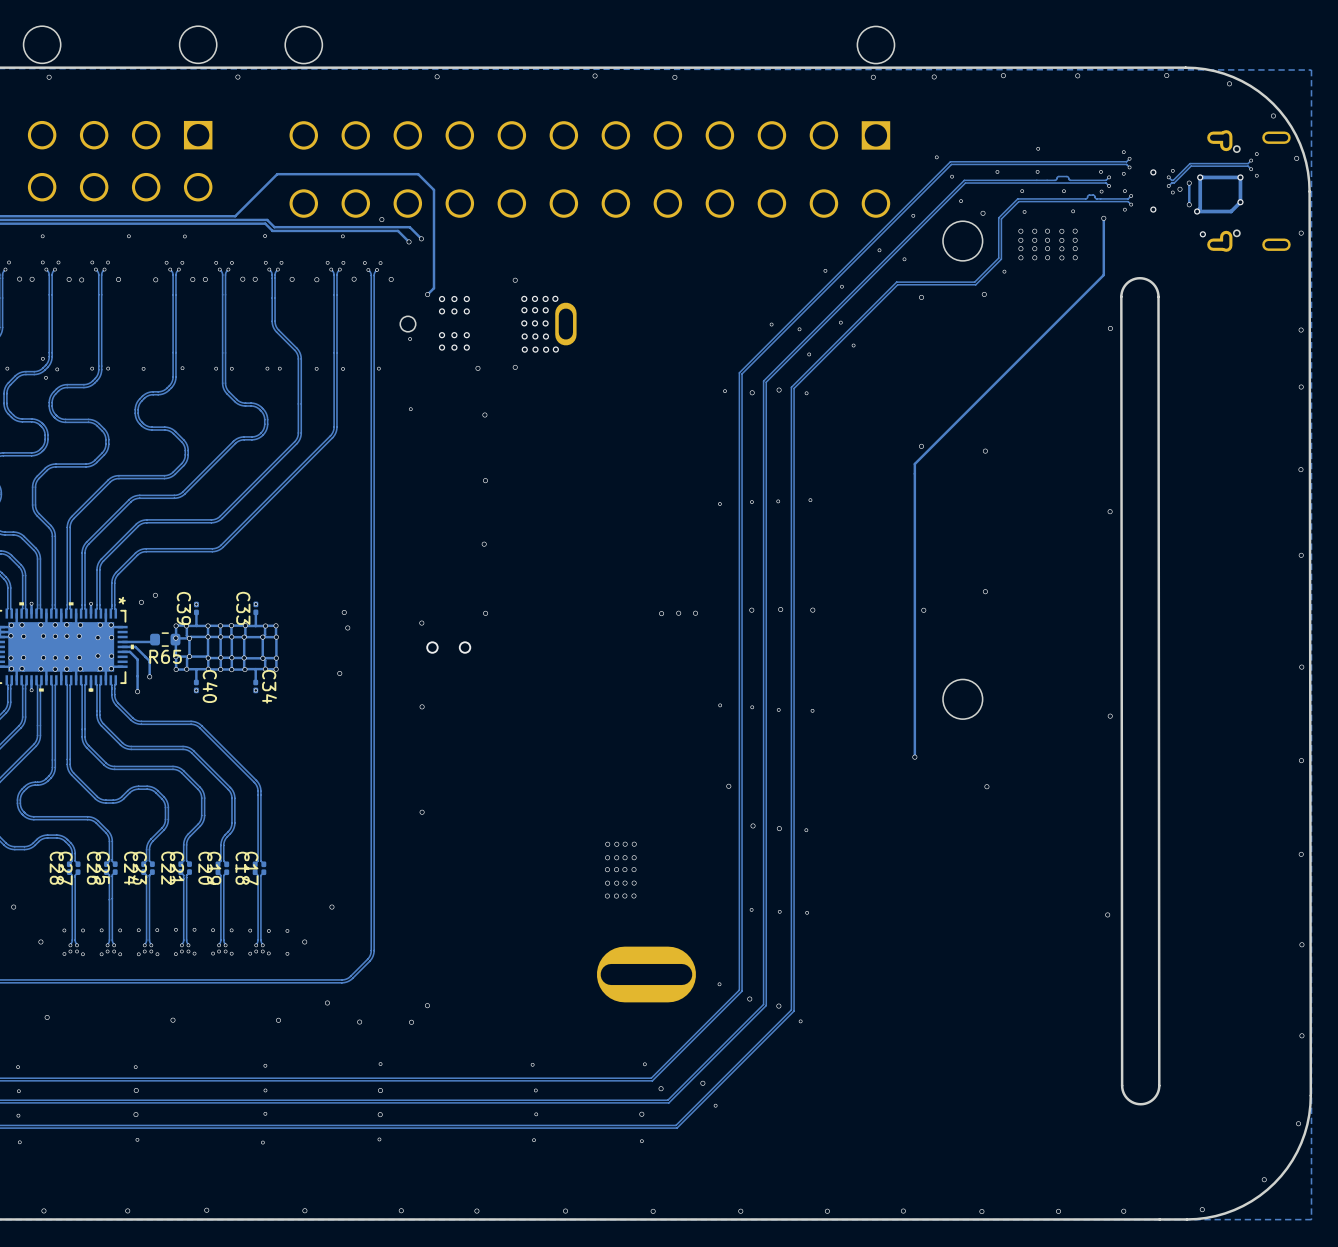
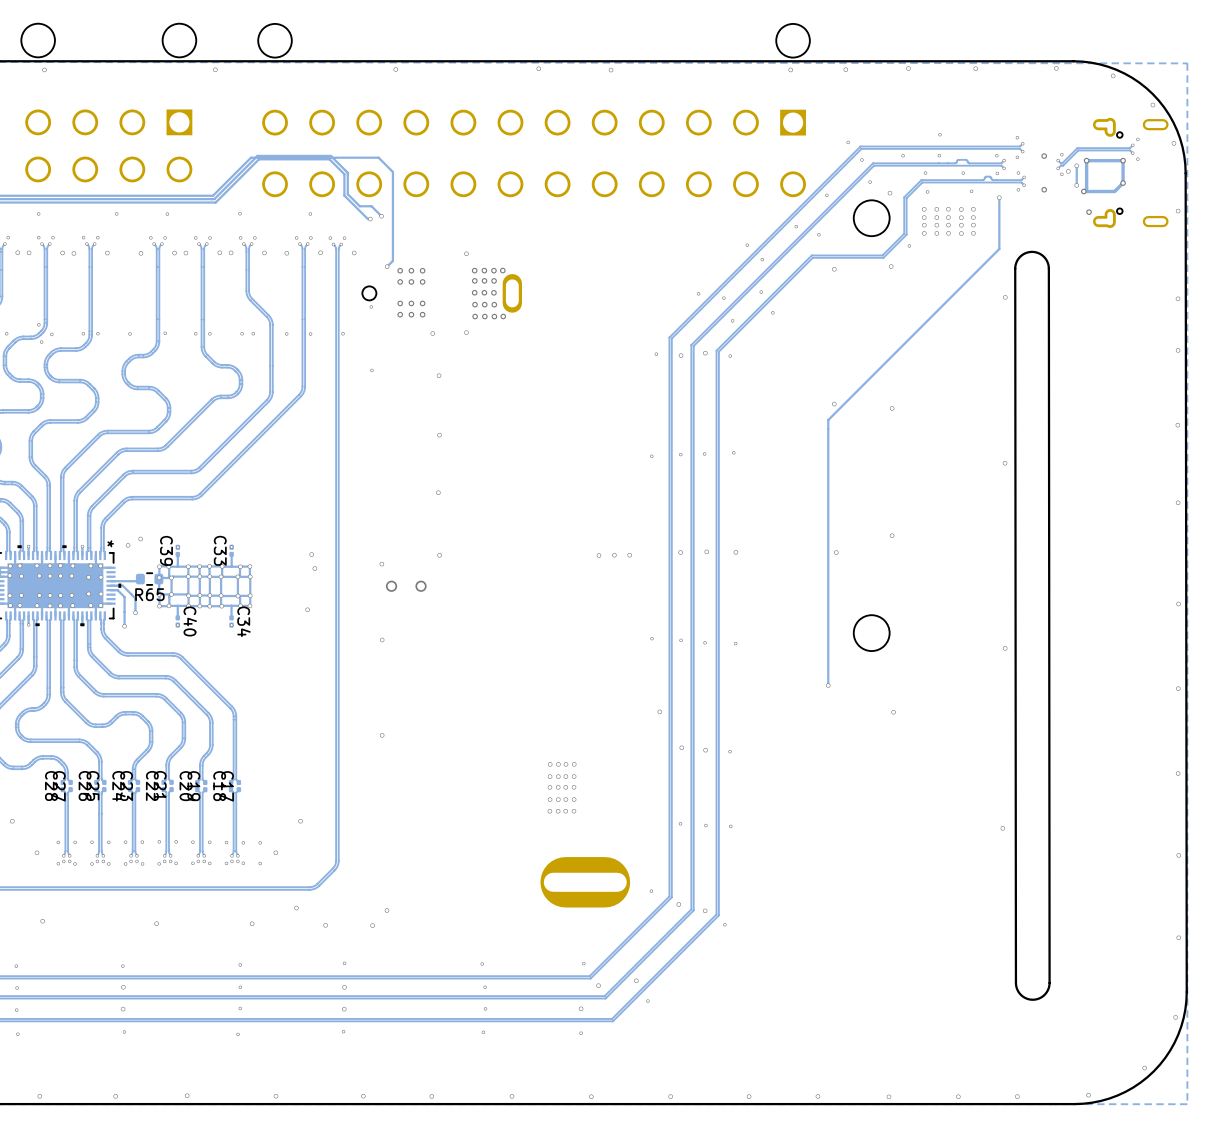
track: (236, 219) (267, 219) (274, 227) (410, 227) -> (214, 199) (257, 155) (330, 155) (347, 172) (347, 194) (359, 206) (371, 206)
via: (381, 219) -> none
track: (238, 223) (265, 223) (272, 230) (398, 230) (409, 241) -> (215, 202) (258, 159) (329, 159) (344, 174) (344, 195) (367, 219) (370, 219)

